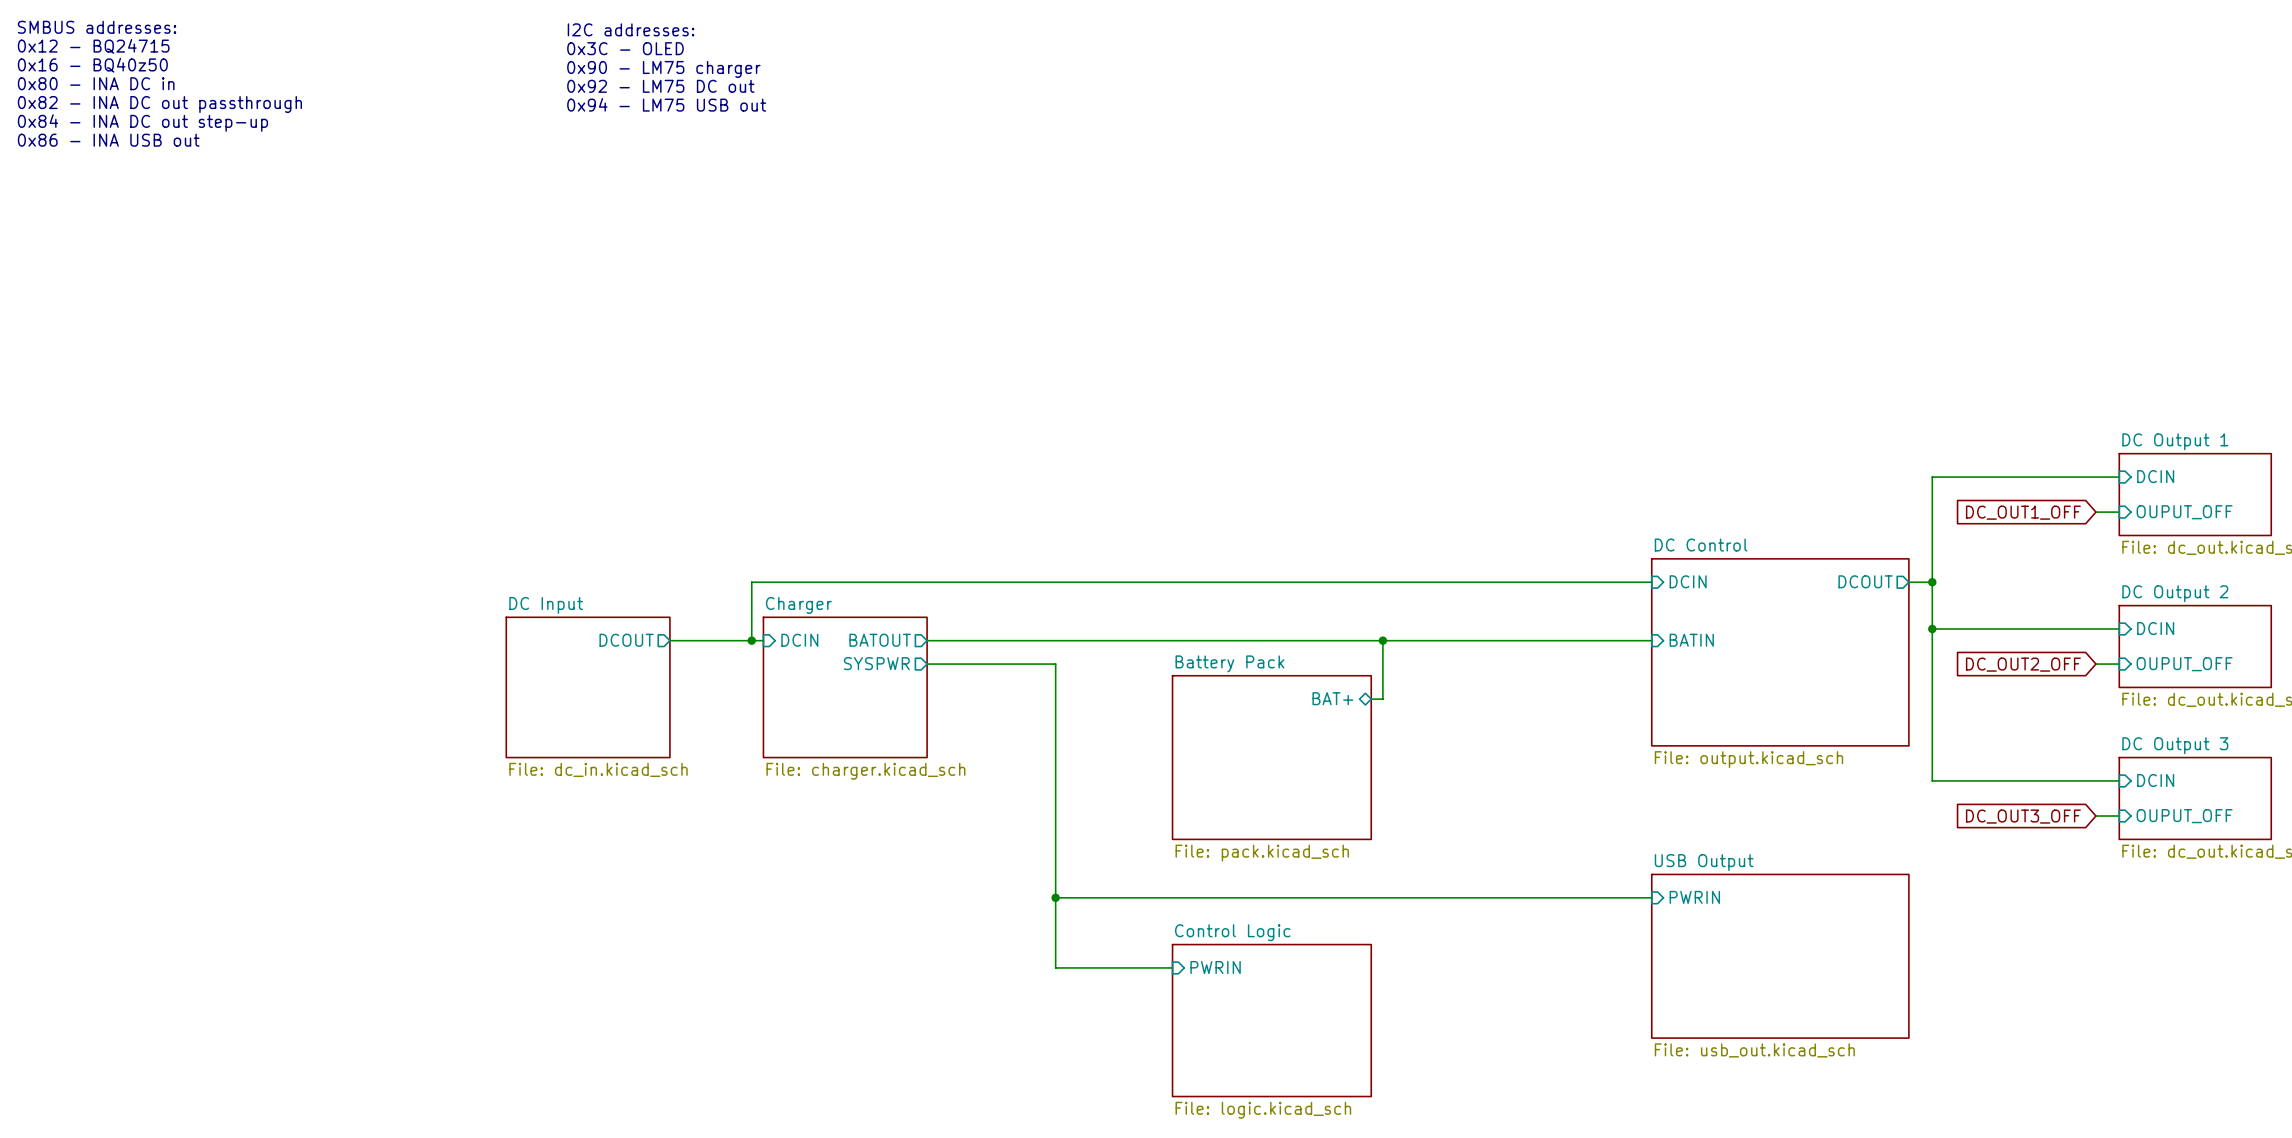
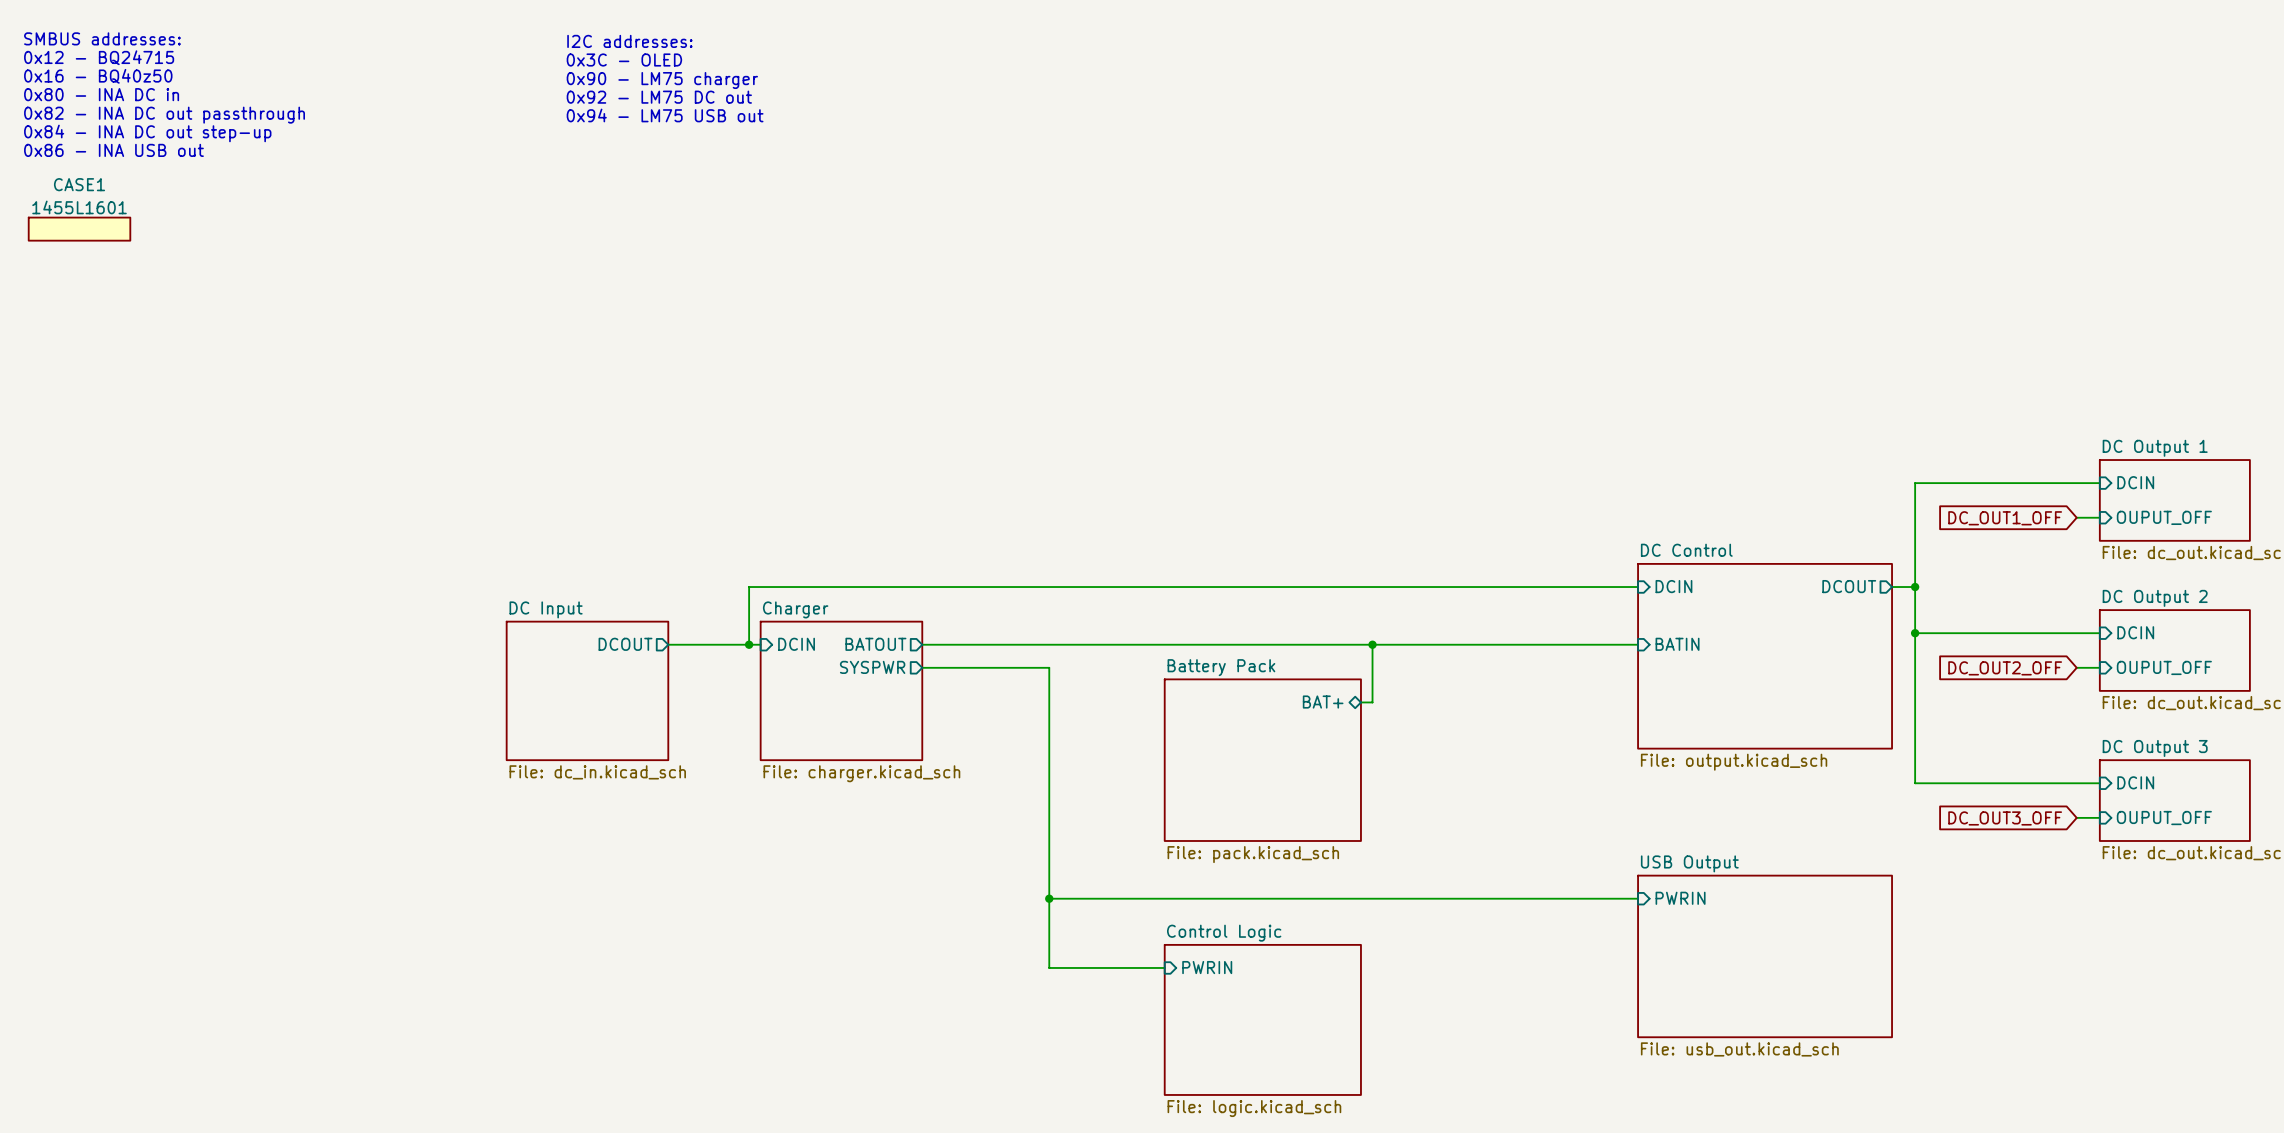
CASE1: none -> 1455L1601 (79, 229)

